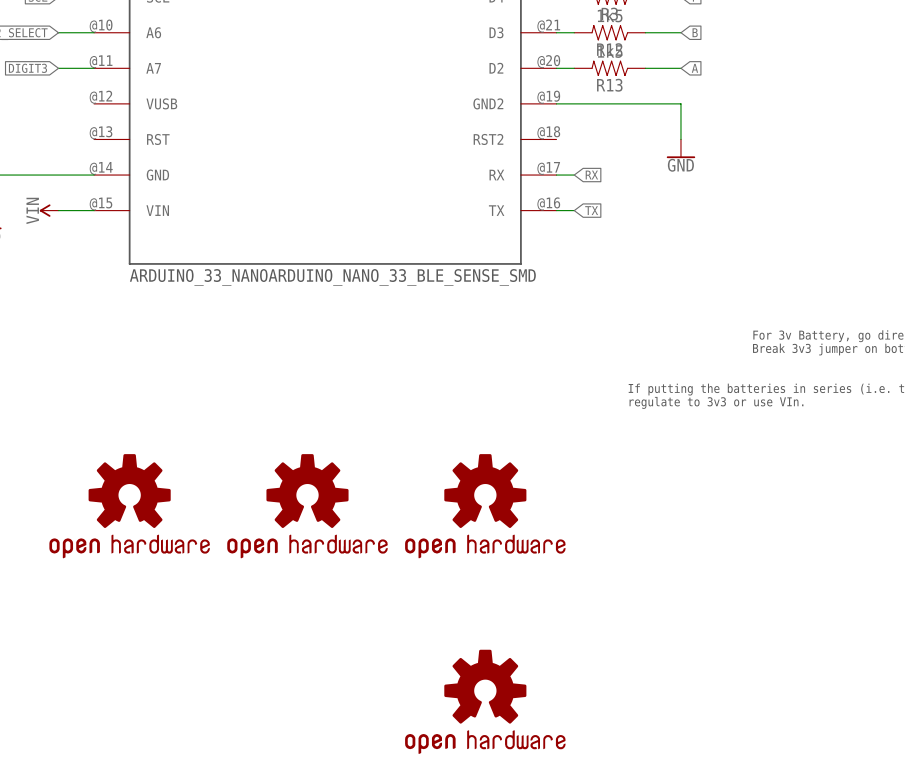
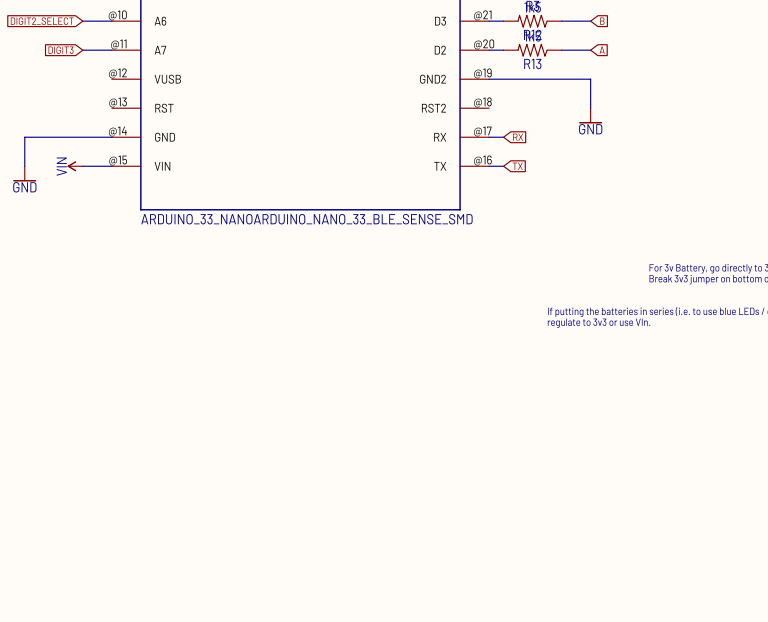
part: (129, 506) -> none
part: (307, 506) -> none
part: (485, 506) -> none
part: (485, 701) -> none

